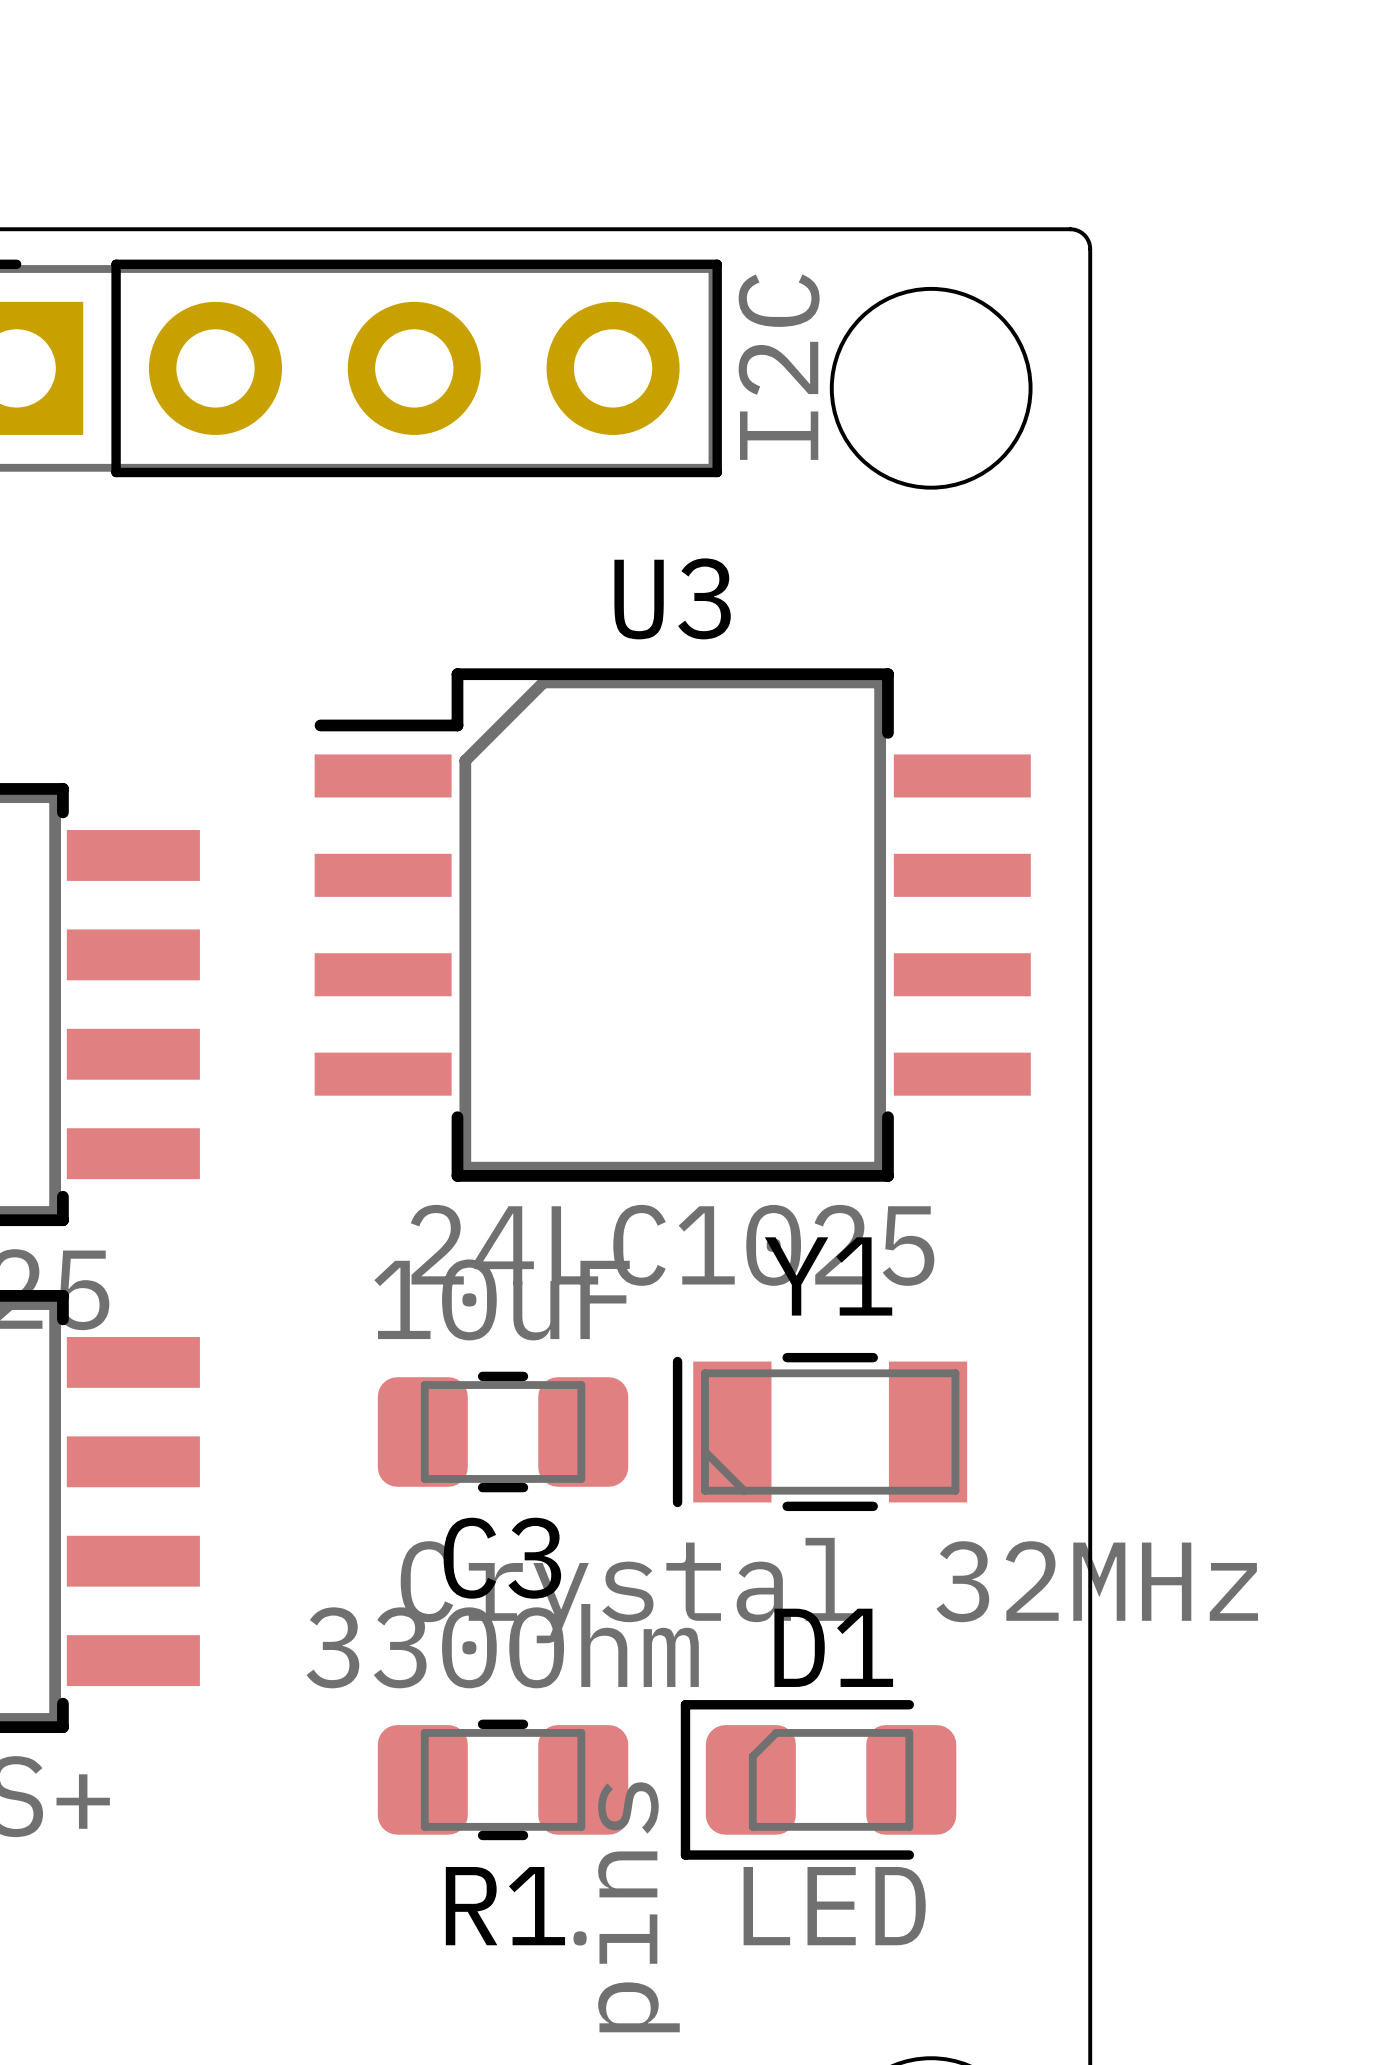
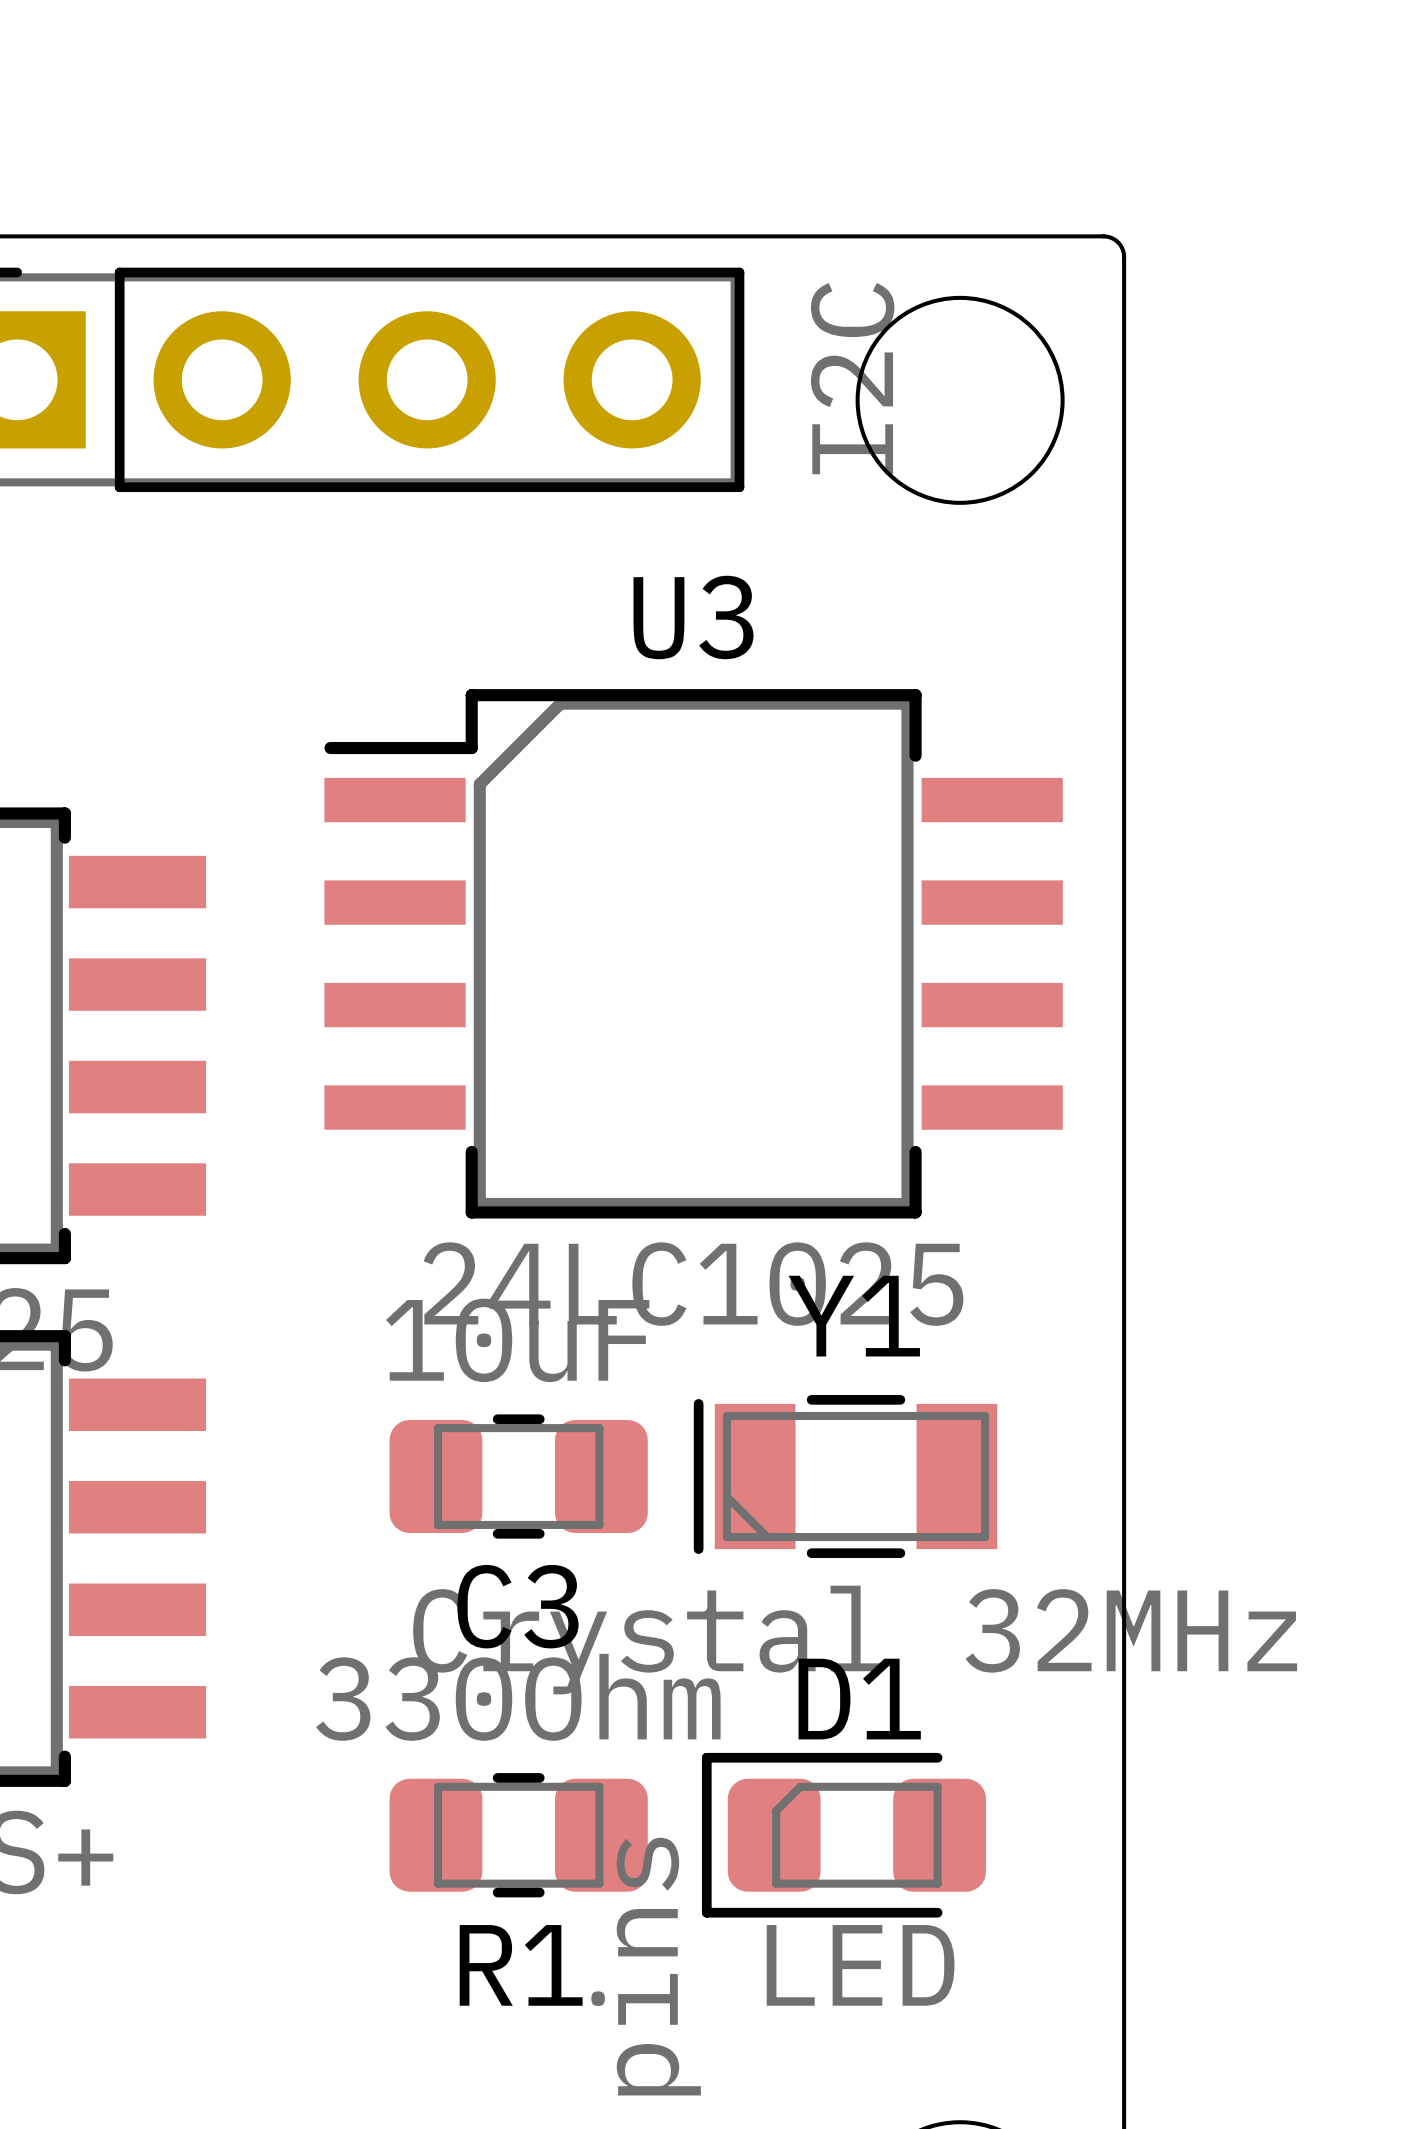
part value position: I2C (779, 367) -> I2C (852, 378)

